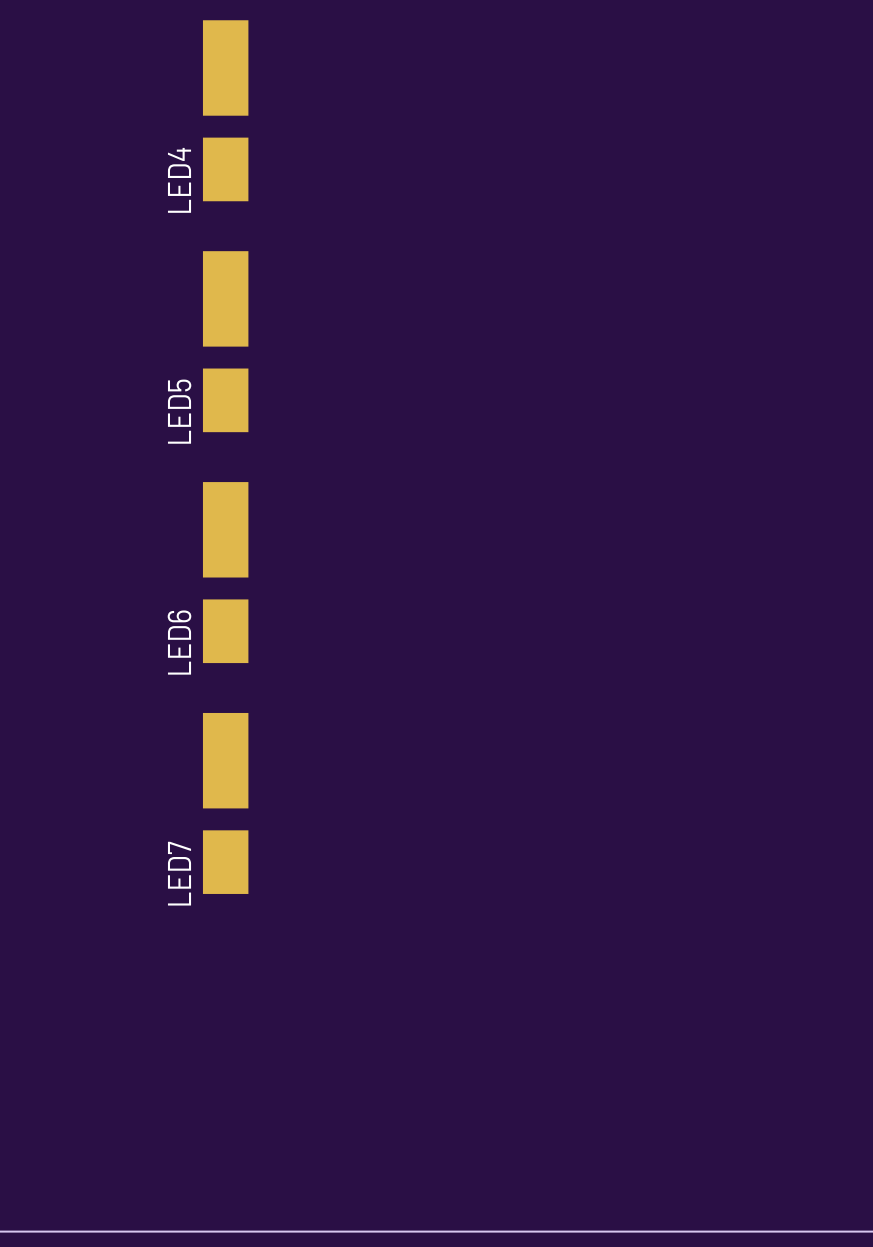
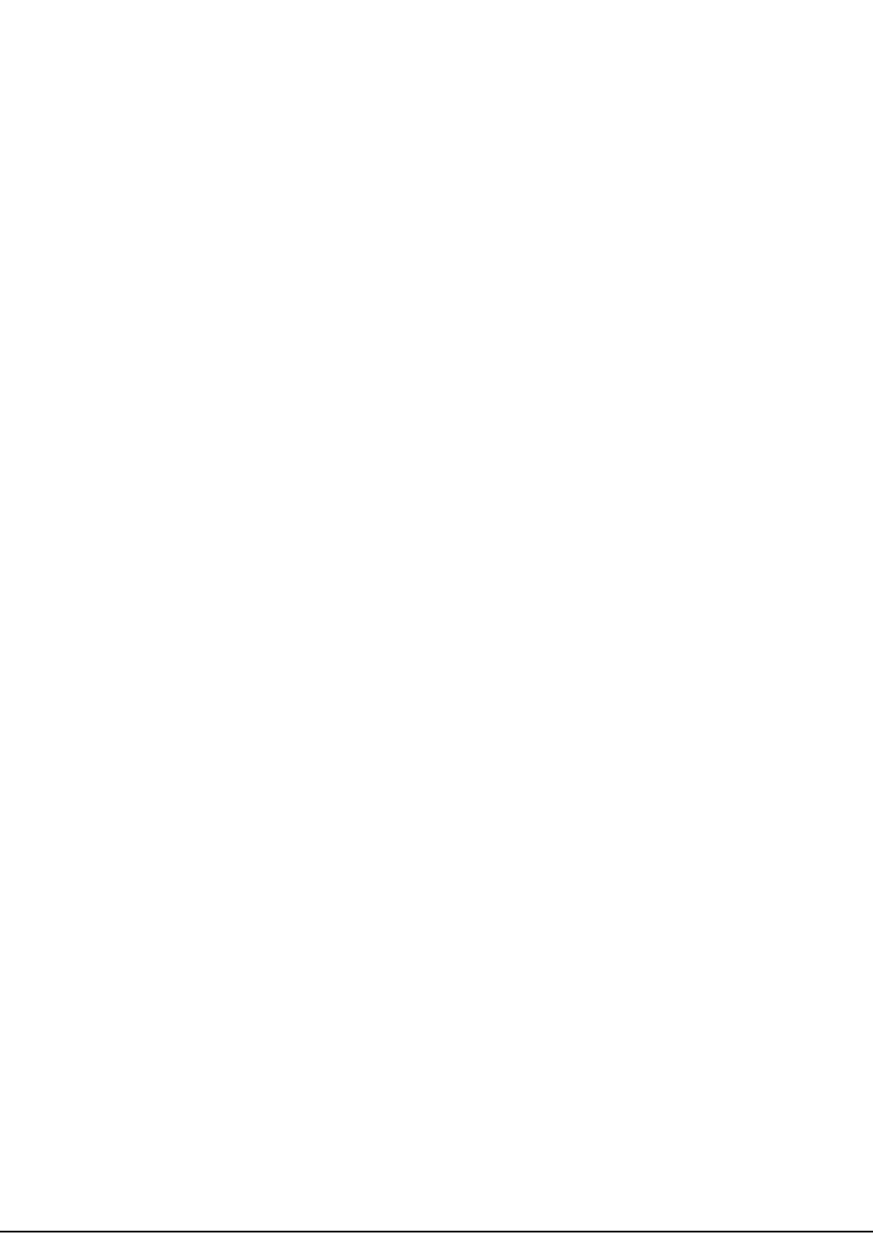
LED4: (225, 110) -> none
LED5: (225, 341) -> none
LED6: (225, 572) -> none
LED7: (225, 803) -> none

